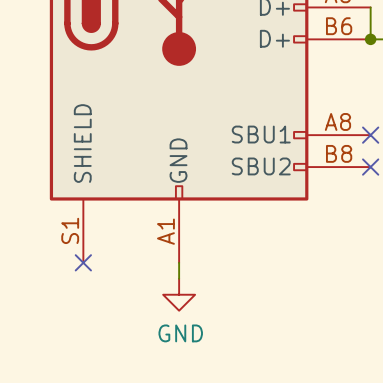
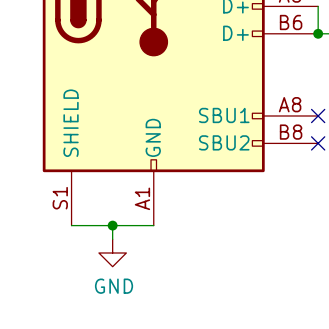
no-connect mark: (83, 262) -> none
wire: none -> (112, 225) (112, 239)
junction: none -> (112, 225)
wire: (179, 262) (179, 278) -> (153, 225) (71, 225)
power symbol position: GND (179, 294) -> GND (112, 253)

